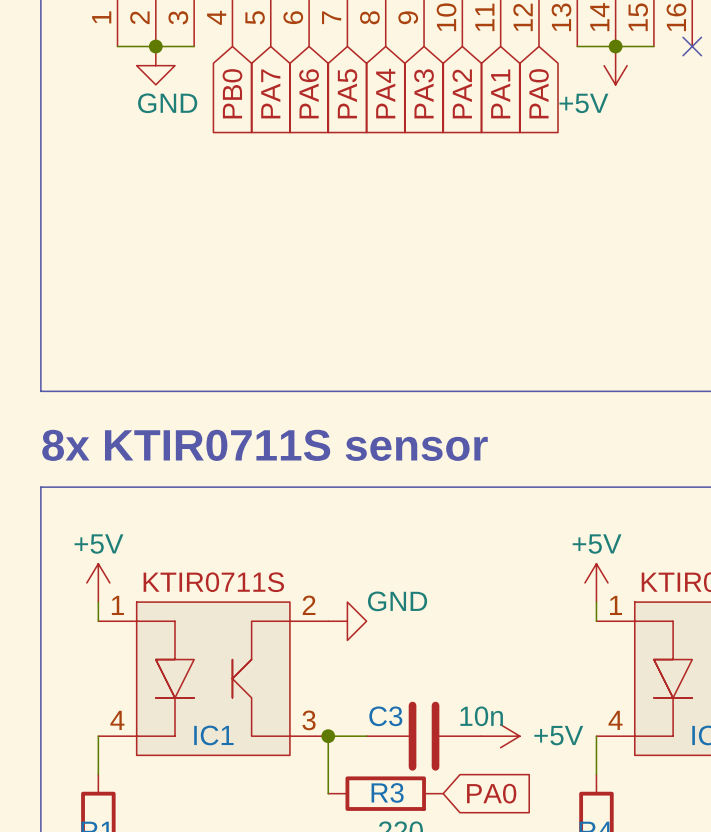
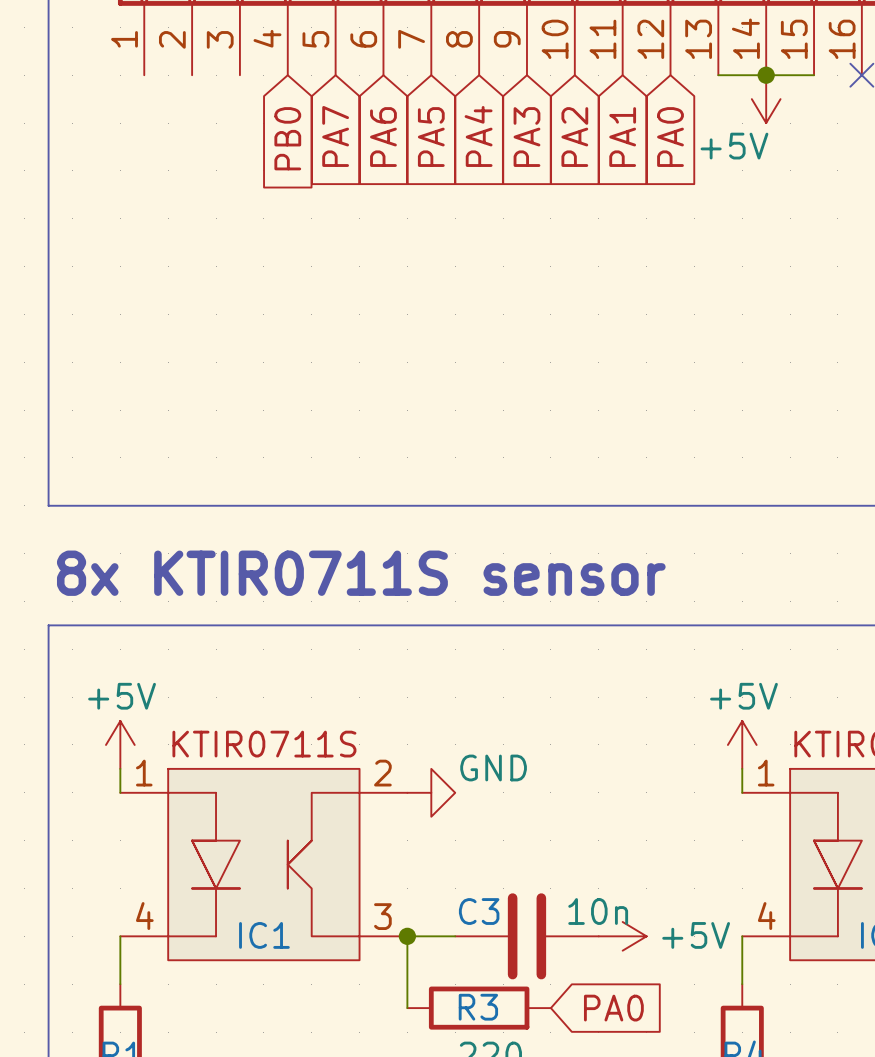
wire: (117, 46) (194, 46) -> none
junction: (155, 46) -> none
power symbol: GND (155, 65) -> none

